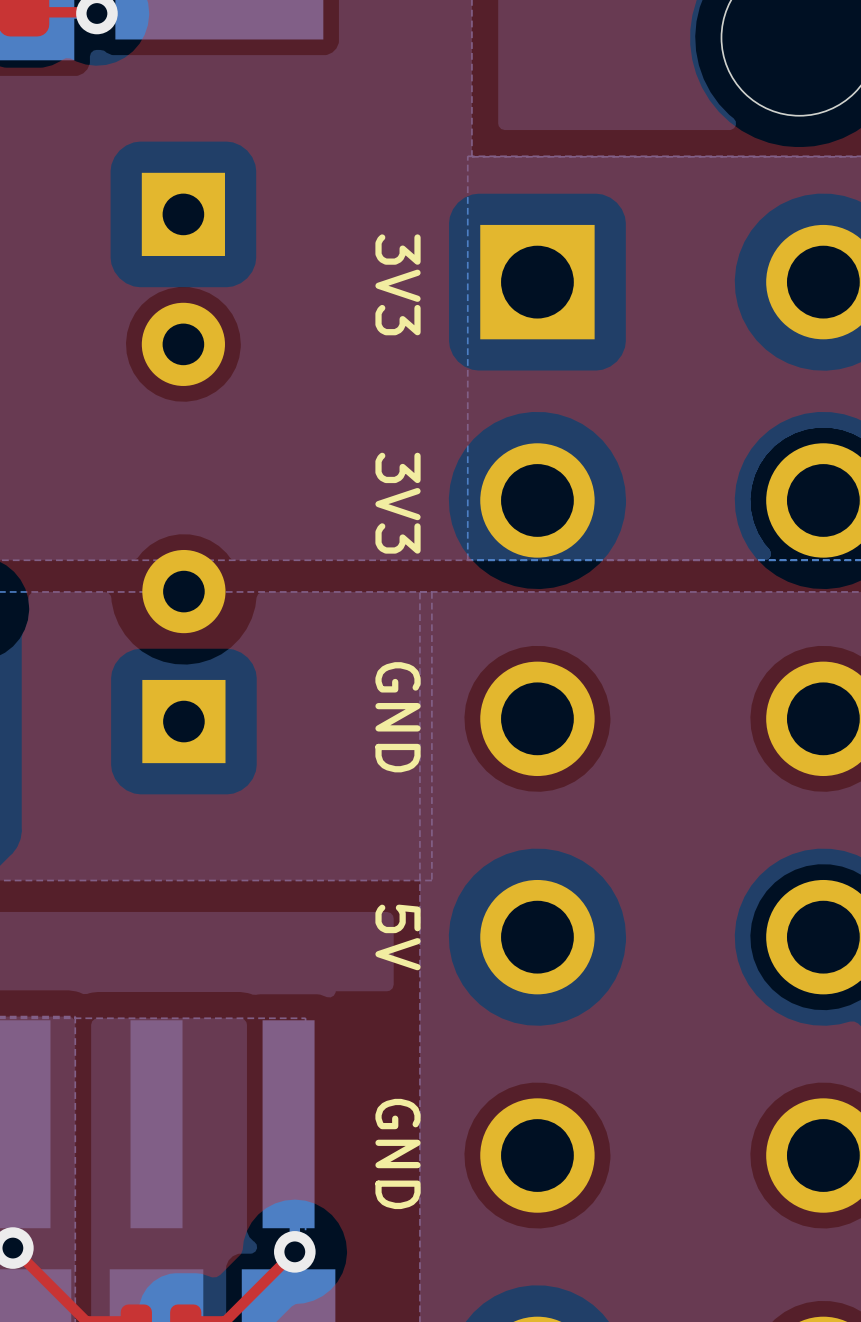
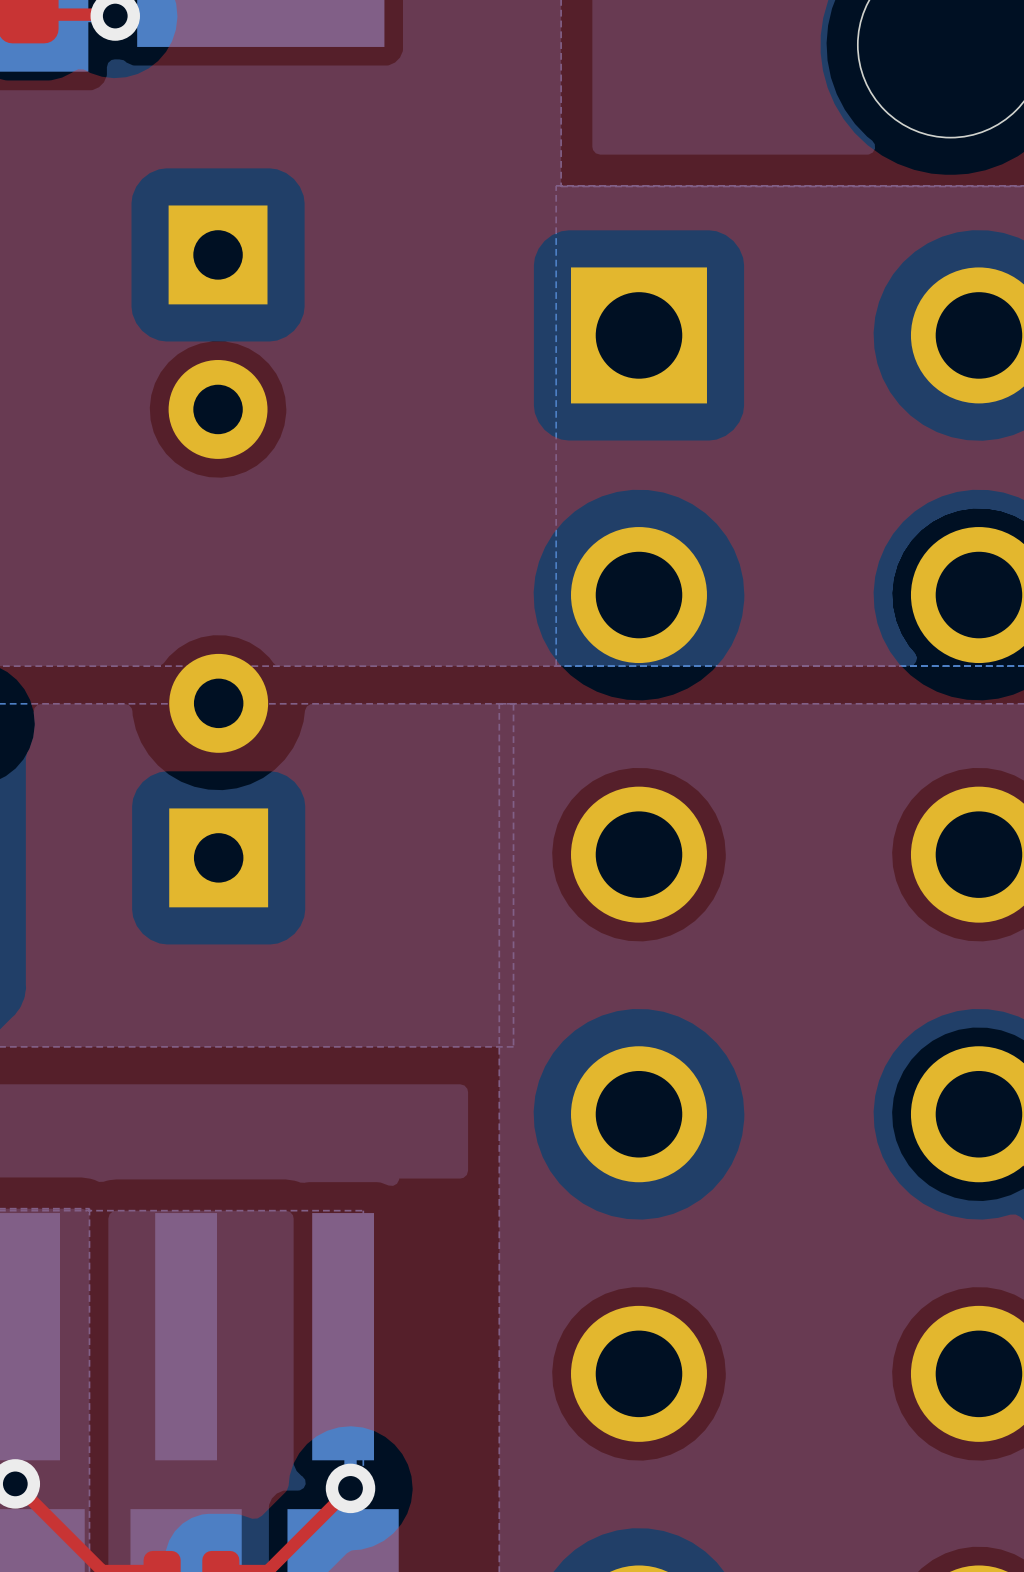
text: 3V3 (398, 284) -> none
text: 3V3 (398, 503) -> none
text: GND (398, 717) -> none
text: 5V (398, 937) -> none
text: GND (398, 1153) -> none

